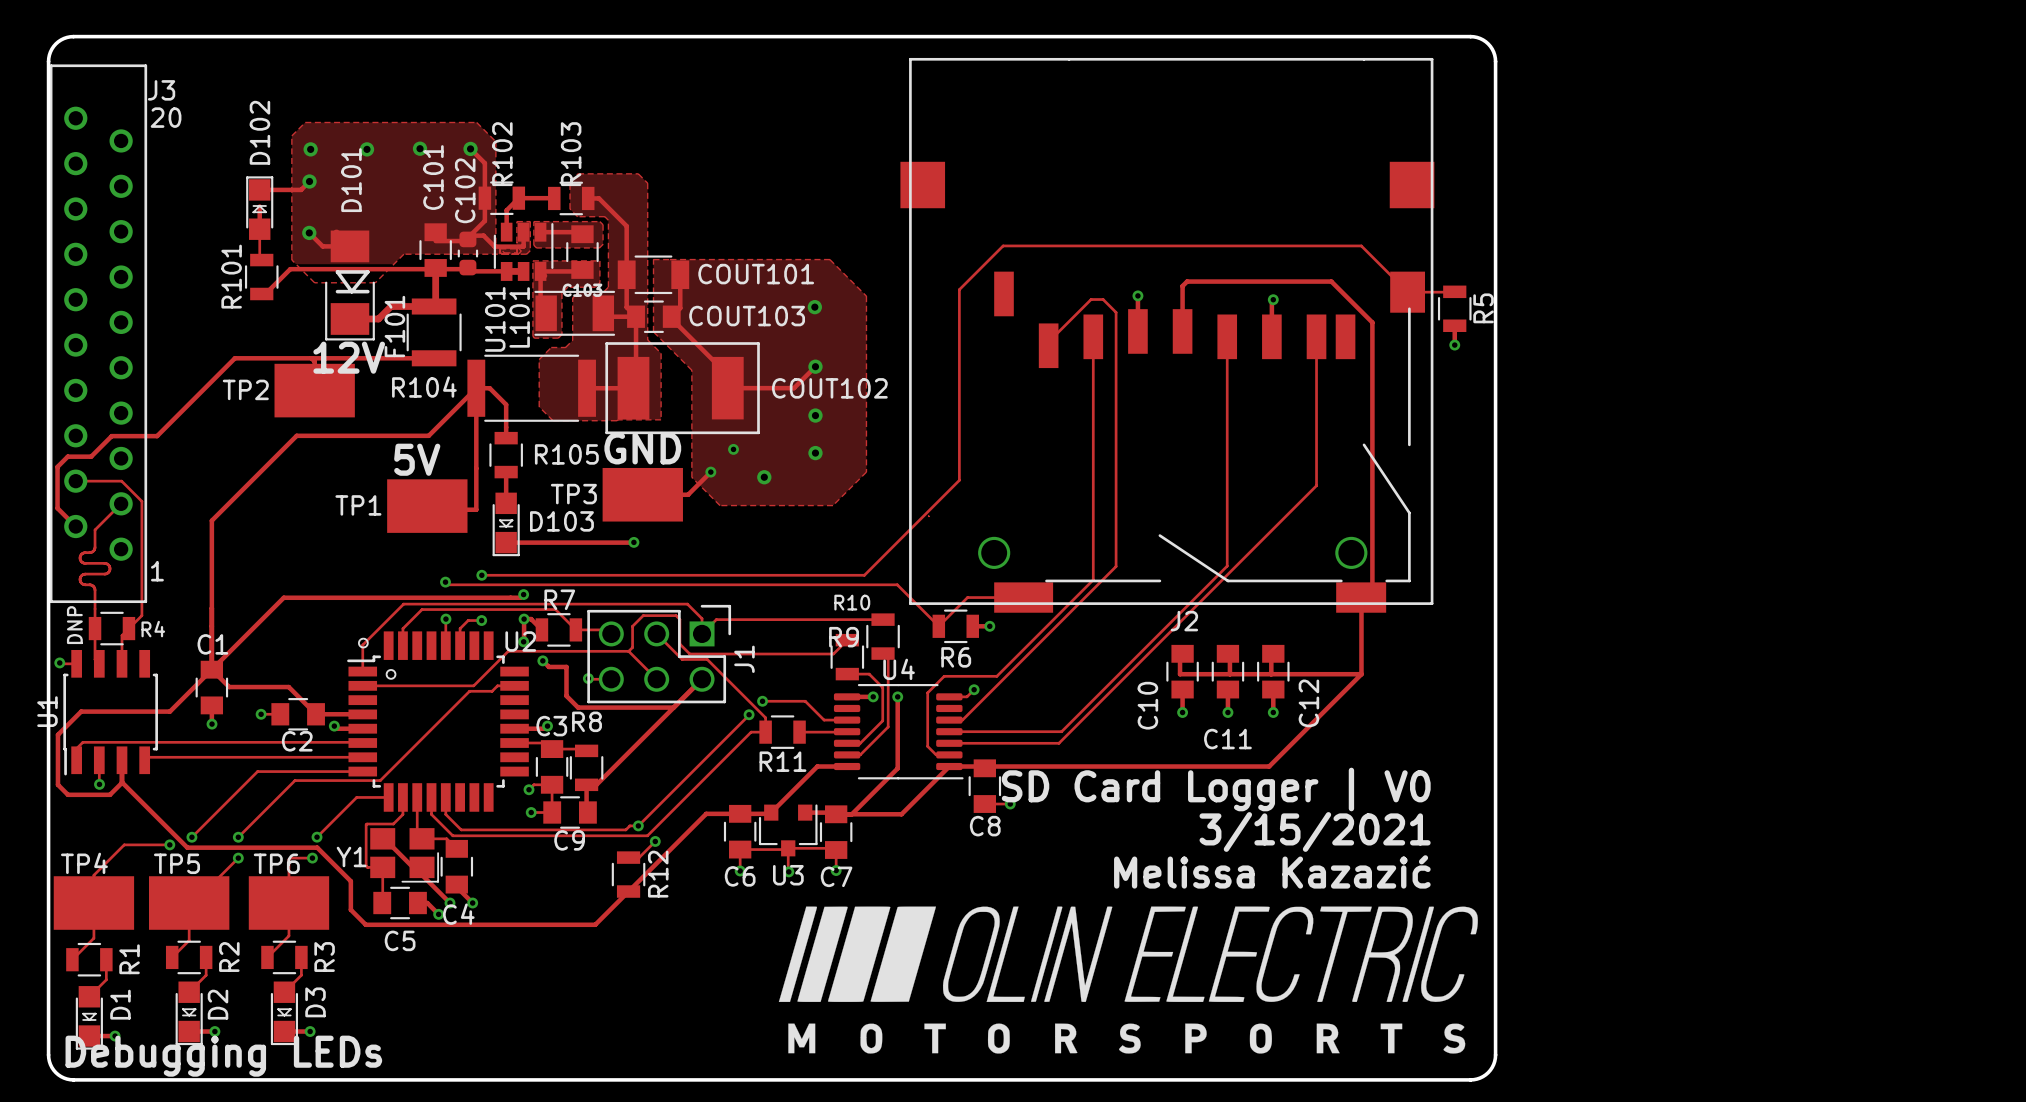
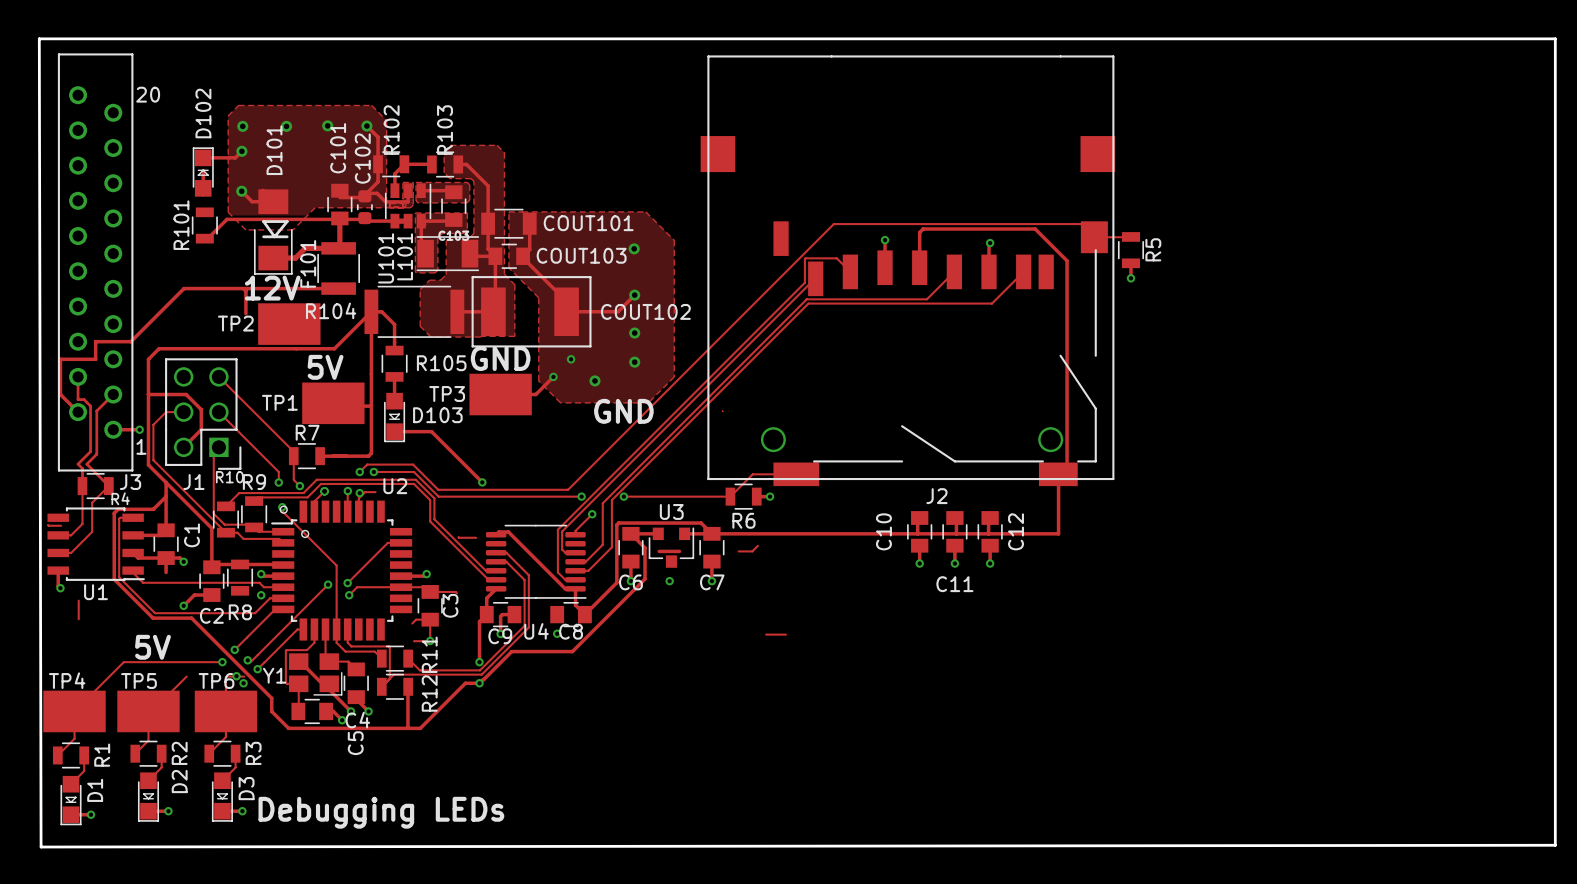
board edge: (73, 36) (63, 38) (55, 43) (50, 52) (48, 61) (48, 1054) (50, 1064) (58, 1074) (73, 1079) (1470, 1079) (1480, 1078) (1488, 1072) (1493, 1064) (1495, 1054) (1495, 61) (1493, 52) (1488, 43) (1480, 38) (1470, 36) -> (58, 38) (39, 38) (41, 847) (1555, 845) (1555, 38) (1143, 38)
J3 name position: J3 (161, 90) -> J3 (130, 482)
track: (259, 229) (259, 258) (261, 260) -> none
track: (1390, 275) (1361, 245) (1003, 245) (959, 289) (959, 480) (864, 575) (481, 575) -> (1081, 224) (833, 224) (568, 489) (438, 489) (413, 464) (367, 464) (359, 471)
J3 position: (98, 333) -> (95, 262)
track: (1093, 336) (1093, 579) (996, 676) (944, 676) (927, 692) (927, 746) (936, 754) (949, 754) -> (850, 271) (836, 258) (805, 258) (804, 282) (557, 529) (557, 572) (565, 579) (575, 579)
track: (1227, 336) (1227, 566) (1061, 731) (949, 731) -> (954, 271) (926, 299) (806, 299) (602, 503) (602, 544) (585, 561) (575, 561)
track: (1316, 336) (1316, 485) (1058, 743) (949, 743) -> (1023, 271) (992, 303) (808, 303) (611, 500) (611, 547) (588, 570) (575, 570)
track: none -> (814, 278) (562, 531) (562, 549) (565, 552) (575, 552)
track: (1048, 345) (1048, 341) (1091, 299) (1103, 299) (1116, 312) (1116, 566) (962, 720) (949, 720) -> none
TP2 position: (314, 390) -> (289, 324)
track: (166, 426) (157, 436) (111, 436) (91, 456) (67, 456) (57, 466) (57, 508) (75, 526) -> (130, 341) (95, 341) (95, 359) (60, 359) (60, 394) (78, 412)
track: (296, 435) (211, 520) (211, 608) -> (231, 348) (159, 348) (148, 359) (148, 464) (211, 528) (211, 567) (214, 564) (277, 565)
track: none -> (78, 376) (78, 399) (84, 399) (90, 406) (90, 451) (78, 464) (82, 468) (82, 523) (71, 535) (58, 535)
track: none -> (218, 376) (293, 451) (293, 479) (299, 486)
track: (75, 481) (121, 481) (141, 501) (141, 615) (121, 635) (121, 663) -> none
track: none -> (113, 394) (96, 410) (96, 454) (86, 464) (108, 486) (92, 502) (92, 531) (71, 552) (58, 552)
track: none -> (148, 394) (186, 394) (201, 409) (201, 429) (183, 447)
track: (121, 503) (95, 529) (93, 550) (83, 553) (80, 556) (83, 562) (105, 563) (109, 567) (107, 573) (84, 574) (80, 579) (82, 583) (91, 585) (94, 588) (95, 659) (99, 663) -> none
track: none -> (371, 406) (371, 453) (368, 456) (320, 456)
text: none -> GND (623, 411)
track: none -> (218, 412) (278, 471) (278, 482)
track: none -> (113, 429) (139, 429)
via: none -> (139, 429)
track: (553, 542) (633, 542) -> (431, 431) (482, 482)
via: (633, 542) -> none
via: (481, 575) -> none
track: (445, 582) (448, 584) (897, 584) (938, 626) -> (623, 496) (730, 496)
via: (445, 582) -> none
via: none -> (359, 471)
track: none -> (373, 471) (413, 471) (438, 496) (581, 496)
via: none -> (373, 471)
track: (523, 594) (520, 597) (283, 597) (217, 664) -> none
via: (523, 594) -> none
via: none -> (482, 482)
via: none -> (278, 482)
via: none -> (299, 486)
via: none -> (324, 491)
via: (524, 619) -> none
track: (883, 619) (716, 619) (702, 633) (702, 618) (687, 604) (403, 604) (362, 645) (362, 671) -> (218, 447) (213, 452) (213, 513) (224, 524) (251, 524) (258, 531) (283, 531)
via: (481, 620) -> none
via: none -> (359, 493)
J2 name position: J2 (1184, 621) -> J2 (936, 496)
text: DNP (74, 625) -> none
via: none -> (581, 496)
via: none -> (623, 496)
R4 position: (111, 628) -> (95, 486)
track: (541, 629) (531, 619) (524, 619) (523, 641) -> none
R7 position: (558, 629) -> (306, 456)
track: none -> (254, 501) (257, 497) (307, 497) (321, 483) (414, 483) (430, 500) (430, 521) (488, 579) (496, 579)
track: (402, 632) (402, 628) (422, 609) (555, 609) (575, 629) (607, 629) (611, 633) -> (314, 501) (324, 491) (321, 491)
track: (656, 633) (682, 659) (707, 659) (765, 717) (765, 732) (751, 732) (647, 835) (452, 835) (442, 825) -> (381, 658) (374, 651) (345, 651)
R9 position: (883, 636) -> (254, 514)
R9 name position: R9 (844, 637) -> R9 (254, 482)
track: none -> (225, 506) (239, 493) (303, 493) (316, 479) (415, 479) (434, 498) (434, 519) (485, 570) (496, 570)
track: none -> (282, 507) (282, 511) (336, 565) (336, 629)
via: none -> (282, 507)
track: (847, 640) (833, 654) (689, 654) (679, 644) (679, 619) (676, 615) (643, 615) (632, 626) (632, 647) (628, 651) -> none
U2 name position: U2 (520, 641) -> U2 (395, 486)
via: (523, 641) -> none
C1 name rotation: 0° (212, 644) -> 90° counterclockwise (191, 535)
C1 name position: C1 (212, 644) -> C1 (191, 535)
track: none -> (592, 514) (575, 530) (575, 534)
via: none -> (592, 514)
track: (628, 651) (508, 651) (473, 685) (362, 685) -> (183, 412) (166, 412) (153, 424) (153, 460) (225, 532) (237, 532) (243, 538) (279, 538) (283, 542)
track: (628, 651) (656, 679) -> none
track: (883, 653) (888, 658) (888, 726) (860, 754) (847, 754) -> none
J1 rotation: 0° (659, 654) -> 90° clockwise (203, 414)
J1 position: (659, 654) -> (203, 414)
R10 position: (847, 657) -> (225, 519)
track: (542, 660) (548, 666) (566, 666) (566, 695) (578, 707) (673, 707) -> none
via: (542, 660) -> none
via: (59, 662) -> none
track: (211, 669) (229, 687) (288, 687) (316, 714) (362, 714) -> none
U4 name position: U4 (899, 669) -> U4 (536, 631)
track: (847, 674) (869, 674) (882, 687) (882, 720) (860, 743) (847, 743) -> none
track: none -> (684, 533) (917, 533)
track: none -> (711, 533) (701, 523) (618, 523) (616, 524) (616, 582) (584, 614) (575, 605) (575, 588) (565, 588) (508, 531) (498, 531) (496, 534)
track: (1361, 674) (1269, 766) (949, 766) (901, 814) (805, 812) -> none
track: (205, 676) (169, 711) (81, 711) (57, 734) (57, 784) (67, 794) (110, 794) (121, 782) (121, 760) -> (161, 535) (133, 535)
via: (588, 678) -> none
track: (702, 679) (596, 784) (586, 784) (587, 812) -> none
via: (974, 689) -> none
track: (492, 691) (469, 691) (380, 780) (295, 780) (238, 837) -> (383, 547) (347, 583)
via: (873, 696) -> none
track: (897, 696) (897, 768) (851, 814) -> none
via: (897, 696) -> none
track: none -> (133, 552) (138, 558) (179, 558) (183, 561)
track: none -> (496, 552) (506, 552) (528, 575) (528, 627) (481, 674) (394, 674) (381, 686)
track: (762, 701) (805, 701) (824, 720) (847, 720) -> none
via: (762, 701) -> none
C12 name position: C12 (1308, 703) -> C12 (1016, 531)
C10 name position: C10 (1147, 705) -> C10 (883, 531)
track: none -> (630, 561) (630, 581)
track: none -> (711, 561) (711, 581)
via: none -> (183, 561)
track: none -> (496, 561) (506, 561) (524, 580) (524, 625) (480, 670) (419, 670) (408, 658)
U1 rotation: 0° (110, 712) -> 90° counterclockwise (96, 544)
via: (261, 714) -> none
C2 rotation: 0° (298, 714) -> 90° clockwise (211, 581)
C2 position: (298, 714) -> (211, 581)
track: (749, 714) (638, 825) (629, 825) (625, 829) (461, 829) (450, 819) -> (389, 678) (389, 646) (351, 646)
via: (749, 714) -> none
track: none -> (58, 570) (58, 585) (60, 588)
R8 name position: R8 (587, 721) -> R8 (240, 612)
via: (212, 724) -> none
C3 name rotation: 0° (551, 726) -> 90° counterclockwise (450, 605)
C3 name position: C3 (551, 726) -> C3 (450, 605)
track: (847, 731) (799, 732) -> none
U4 position: (898, 731) -> (536, 561)
R11 position: (782, 732) -> (394, 658)
via: none -> (630, 581)
via: none -> (669, 581)
via: none -> (711, 581)
via: none -> (347, 583)
track: none -> (328, 584) (250, 662)
via: none -> (328, 584)
track: (362, 742) (82, 742) (76, 748) (76, 760) -> (283, 587) (263, 587) (259, 582) (143, 582) (133, 572) (133, 570)
track: none -> (401, 587) (357, 587) (349, 595)
via: none -> (60, 588)
track: none -> (496, 588) (486, 598) (486, 614) (479, 621) (479, 662)
track: none -> (211, 595) (194, 595) (183, 605)
via: none -> (261, 595)
via: none -> (349, 595)
track: (345, 757) (147, 757) (144, 760) -> (270, 598) (255, 613) (155, 613) (119, 577) (119, 518) (133, 517)
R11 name rotation: 0° (782, 761) -> 90° counterclockwise (429, 654)
via: none -> (183, 605)
track: (847, 766) (817, 766) (770, 813) (706, 813) (595, 924) (539, 924) -> (657, 534) (630, 533) (645, 547) (645, 579) (572, 651) (511, 651) (479, 683) (465, 683) (420, 728)
R8 position: (586, 767) -> (240, 577)
track: (352, 771) (257, 771) (191, 837) -> (275, 609) (233, 651)
track: (121, 782) (187, 847) (317, 847) (350, 881) (350, 909) (365, 924) (369, 924) -> (166, 496) (153, 509) (118, 509) (114, 513) (114, 579) (153, 618) (191, 618) (271, 698) (271, 711) (288, 728)
via: (99, 784) -> none
track: none -> (514, 620) (514, 614) (502, 614) (500, 616) (500, 633)
C8 rotation: 0° (984, 786) -> 90° clockwise (571, 614)
C8 position: (984, 786) -> (571, 614)
via: (528, 789) -> none
text: SD Card Logger | V0 (1216, 789) -> none
track: (381, 797) (356, 797) (317, 837) -> (297, 629) (264, 662)
via: none -> (557, 633)
via: none -> (500, 633)
via: (1010, 804) -> none
via: (531, 812) -> none
via: none -> (430, 641)
C9 position: (570, 812) -> (500, 614)
text: none -> 5V (152, 647)
via: none -> (234, 649)
via: (638, 825) -> none
U3 position: (788, 830) -> (671, 547)
C6 position: (740, 831) -> (630, 547)
text: 3/15/2021 (1315, 831) -> none
C7 position: (836, 832) -> (711, 547)
via: (191, 837) -> none
via: (238, 837) -> none
via: none -> (222, 662)
track: none -> (264, 662) (257, 669)
via: none -> (479, 662)
track: (655, 841) (639, 857) (628, 857) -> none
via: (655, 841) -> none
track: (169, 844) (124, 844) (93, 875) (93, 903) -> (222, 662) (123, 662) (74, 711)
via: (169, 844) -> none
via: none -> (257, 669)
track: (788, 848) (740, 849) (740, 870) -> none
track: (788, 848) (834, 848) (836, 850) (836, 870) -> none
track: (788, 848) (788, 871) -> none
via: none -> (236, 676)
via: (238, 858) -> none
via: (312, 858) -> none
via: none -> (243, 683)
via: none -> (479, 683)
via: (740, 870) -> none
via: (836, 870) -> none
track: none -> (408, 686) (407, 728)
via: (788, 871) -> none
text: Melissa Kazazić (1272, 871) -> none
R12 rotation: 0° (628, 874) -> 90° clockwise (394, 686)
R12 position: (628, 874) -> (394, 686)
U3 name position: U3 (788, 875) -> U3 (671, 511)
drawing: [778, 906, 1478, 1054] -> none
C5 name rotation: 0° (400, 940) -> 90° counterclockwise (355, 743)
C5 name position: C5 (400, 940) -> C5 (355, 743)
D2 name position: D2 (217, 1004) -> D2 (179, 781)
text position: Debugging LEDs (223, 1056) -> Debugging LEDs (381, 812)

